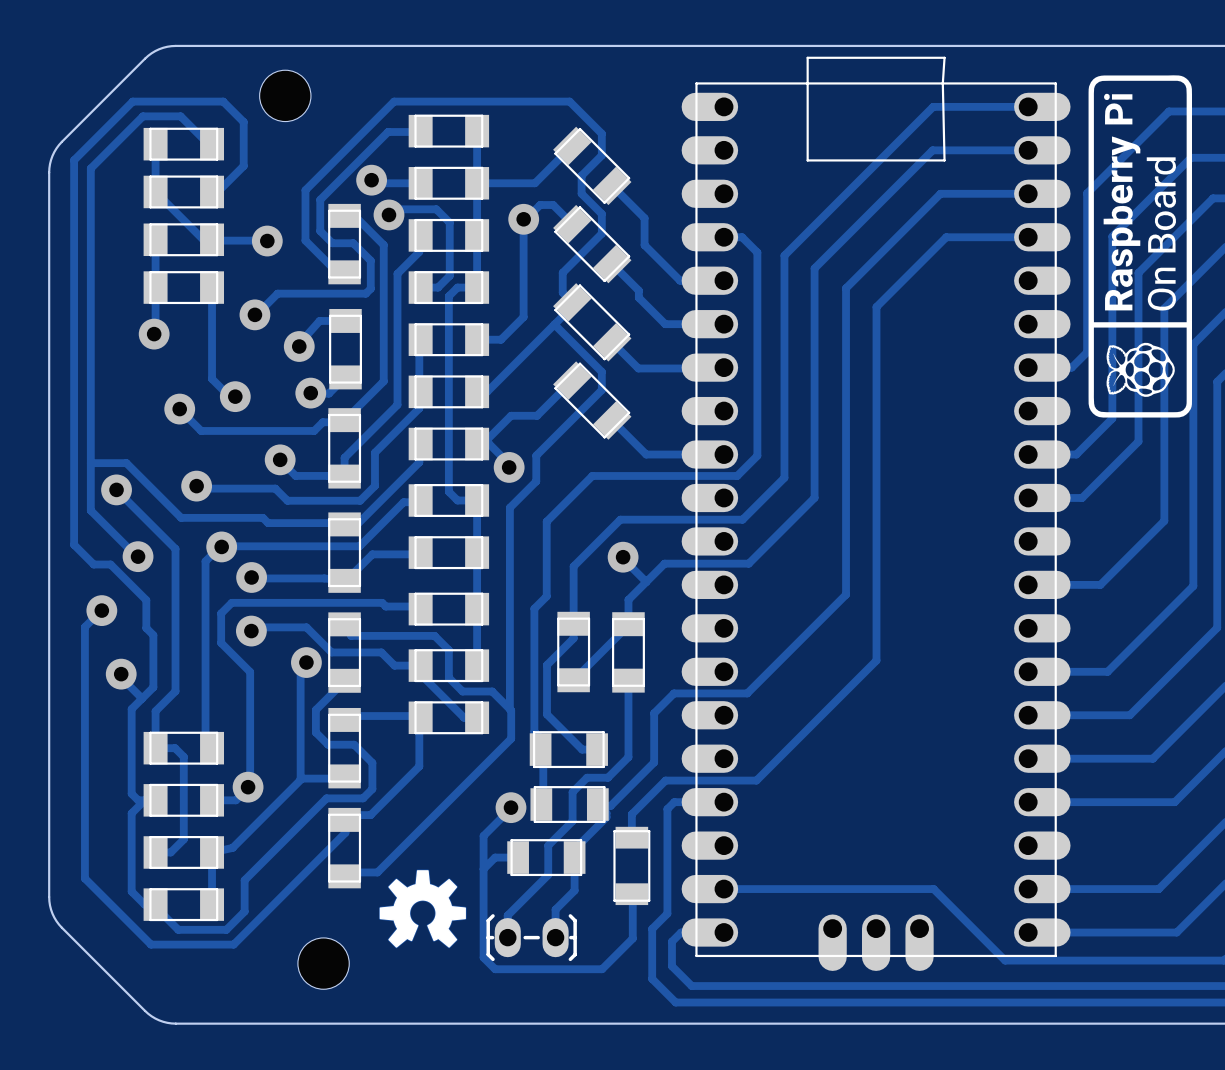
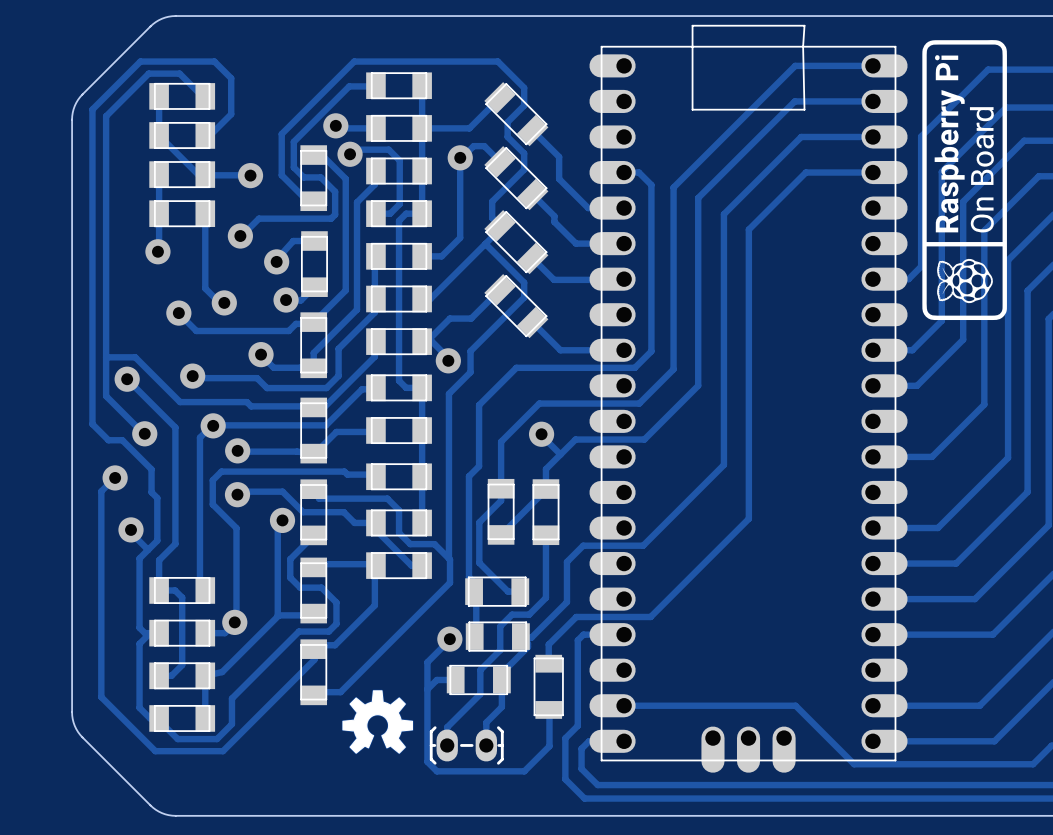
hole: (285, 95) -> none
hole: (323, 963) -> none

